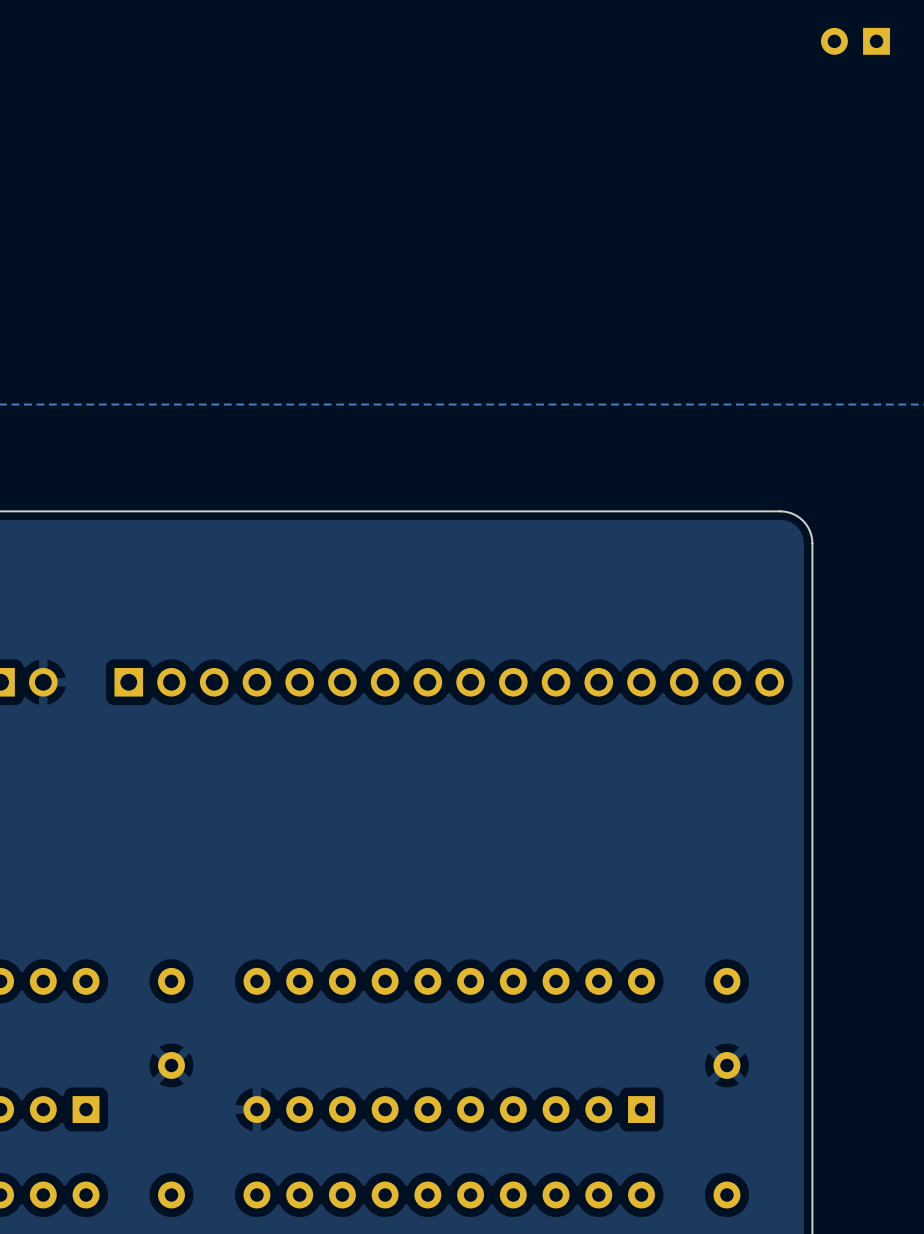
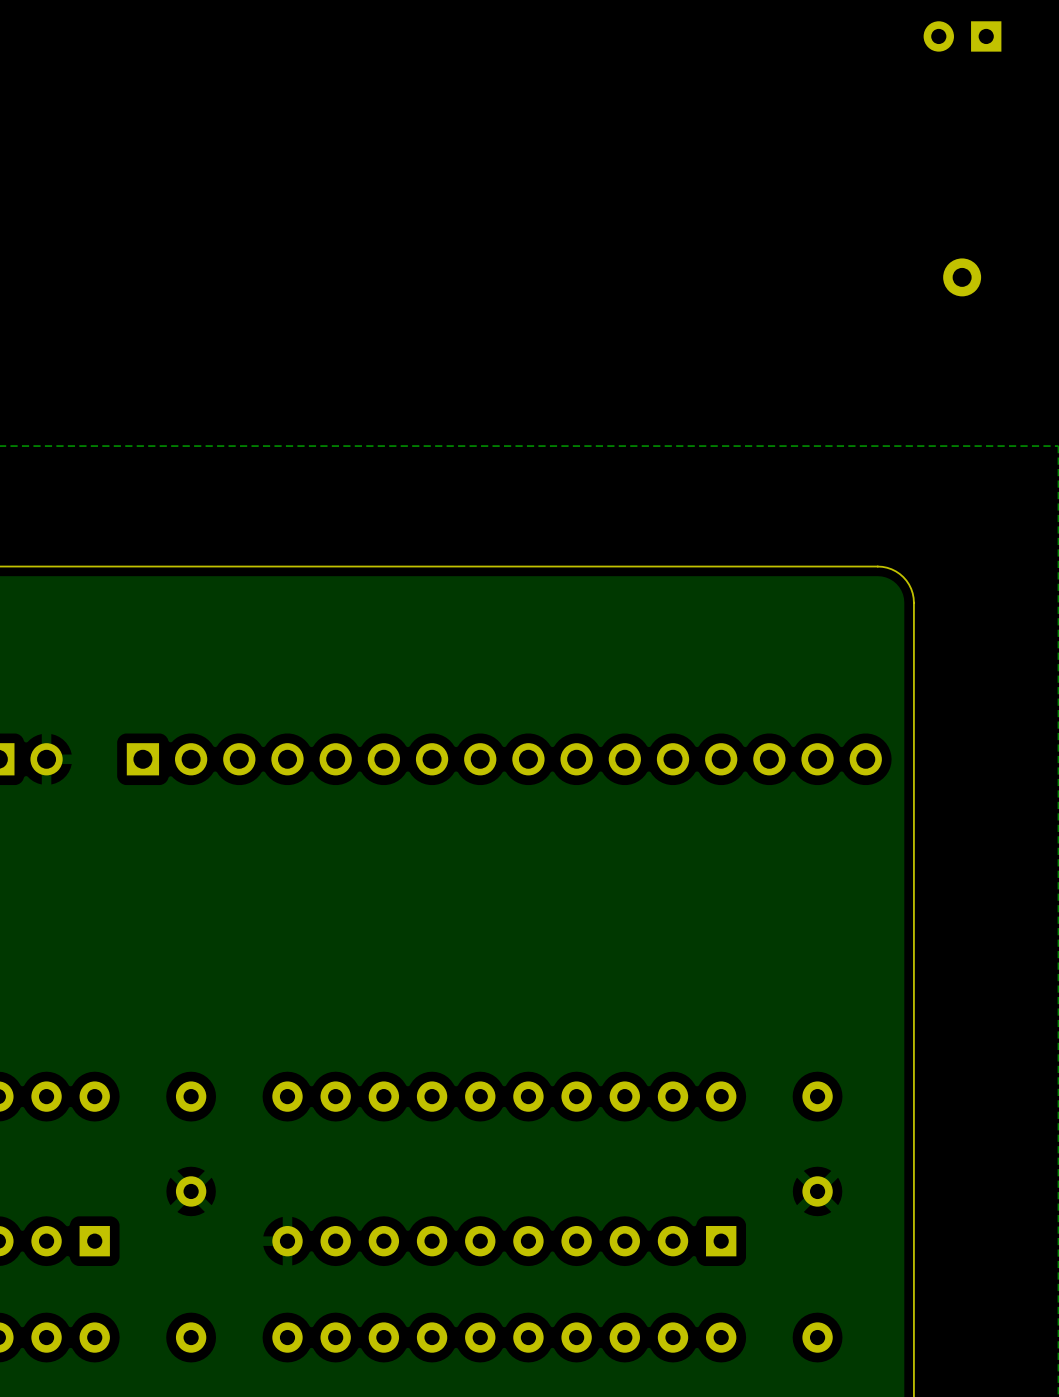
part: none -> (962, 277)

